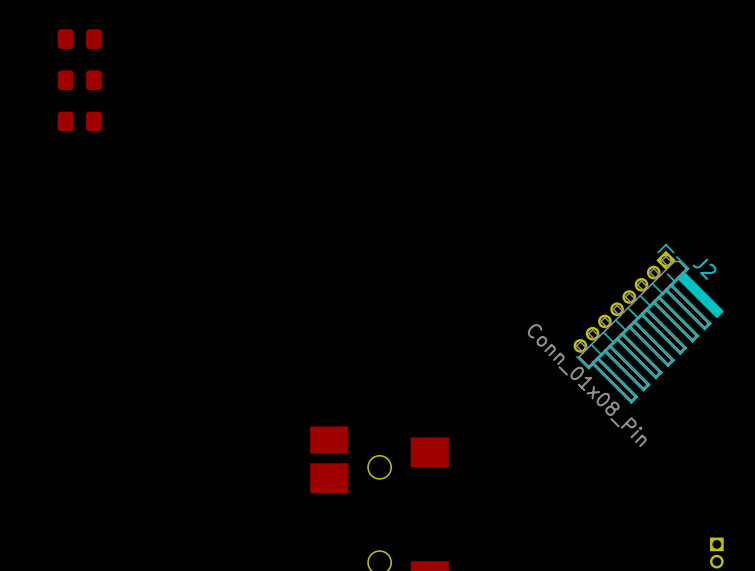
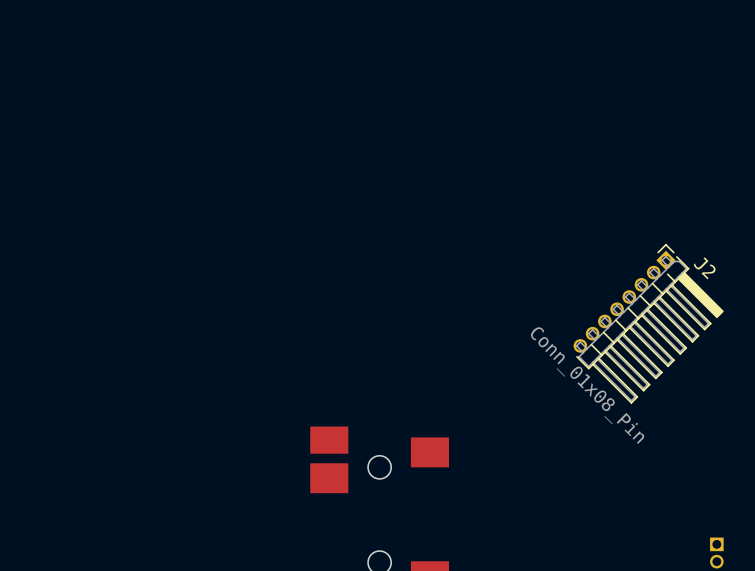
part: (79, 39) -> none
part: (79, 80) -> none
part: (79, 121) -> none

